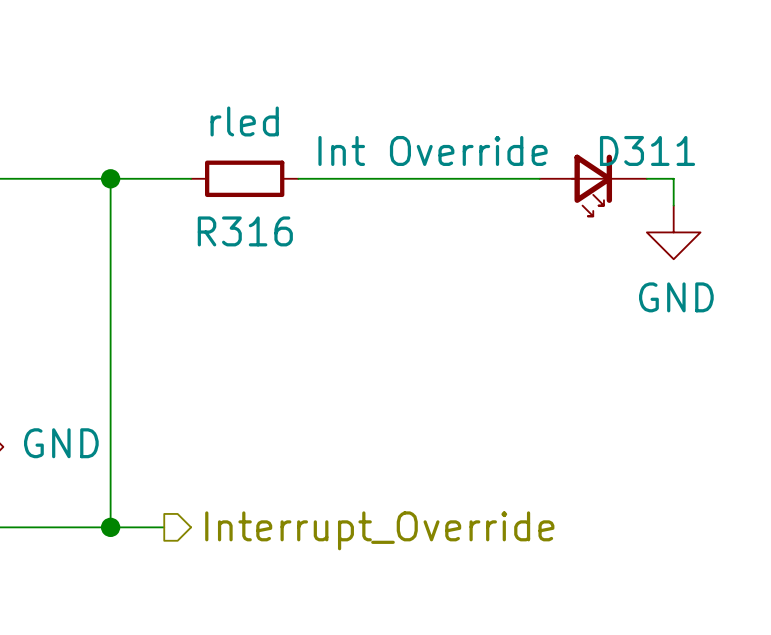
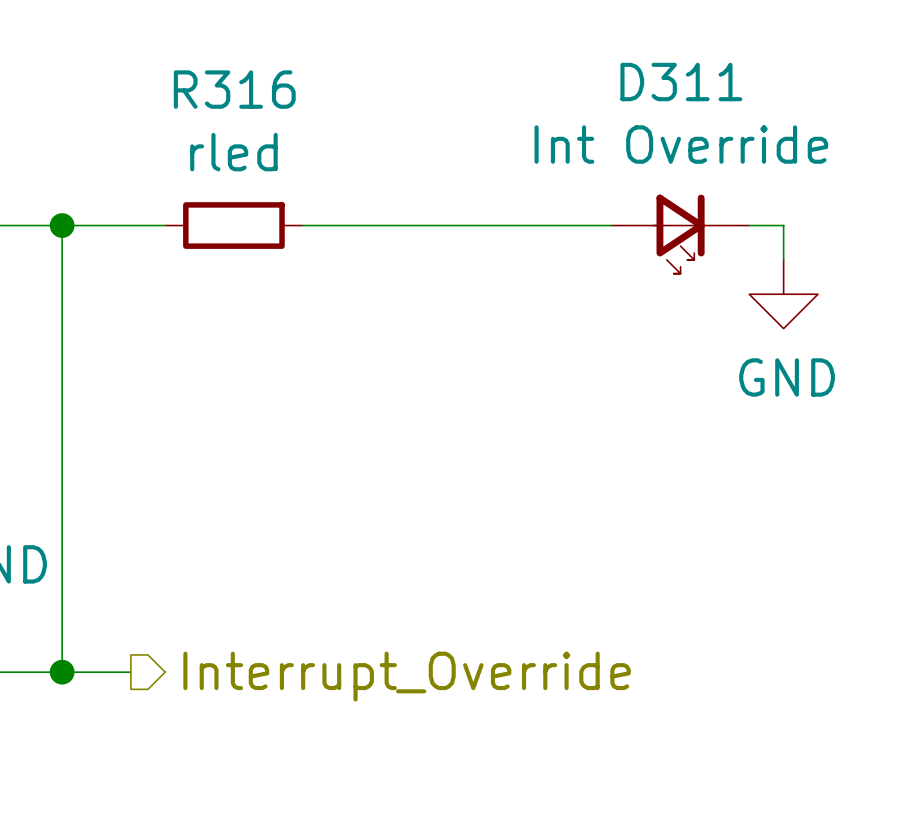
D311 value position: Int Override (433, 150) -> Int Override (681, 144)
D311 name position: D311 (647, 150) -> D311 (681, 82)
R316 name position: R316 (245, 231) -> R316 (234, 89)

